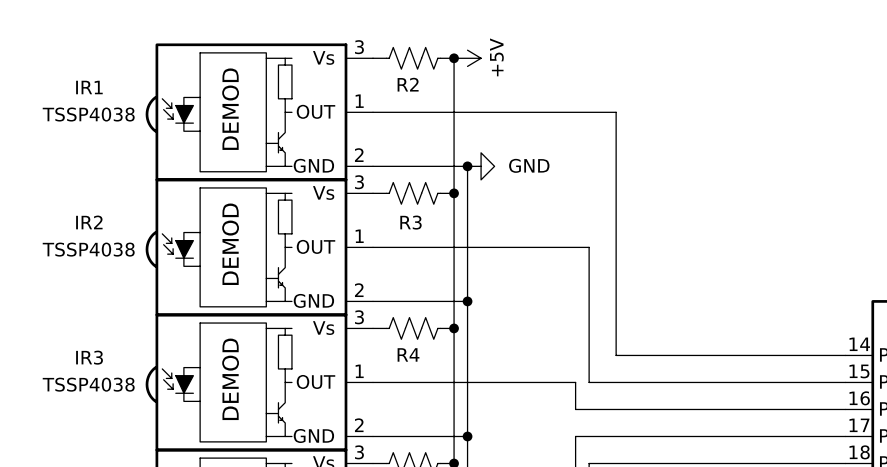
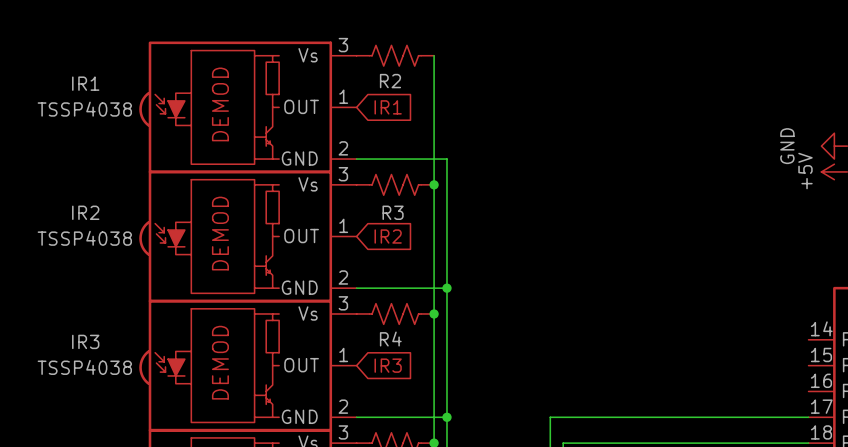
junction: (454, 58) -> none
power symbol: +5V (467, 58) -> none
wire: (373, 112) (616, 112) (616, 355) (845, 355) -> none
global label: none -> IR1 (388, 107)
power symbol: none -> GND (834, 146)
junction: (467, 166) -> none
power symbol: GND (481, 166) -> none
power symbol: none -> +5V (834, 171)
wire: (373, 247) (589, 247) (589, 382) (845, 382) -> none
global label: none -> IR2 (388, 236)
wire: (373, 382) (575, 382) (575, 409) (845, 409) -> none
global label: none -> IR3 (388, 365)

